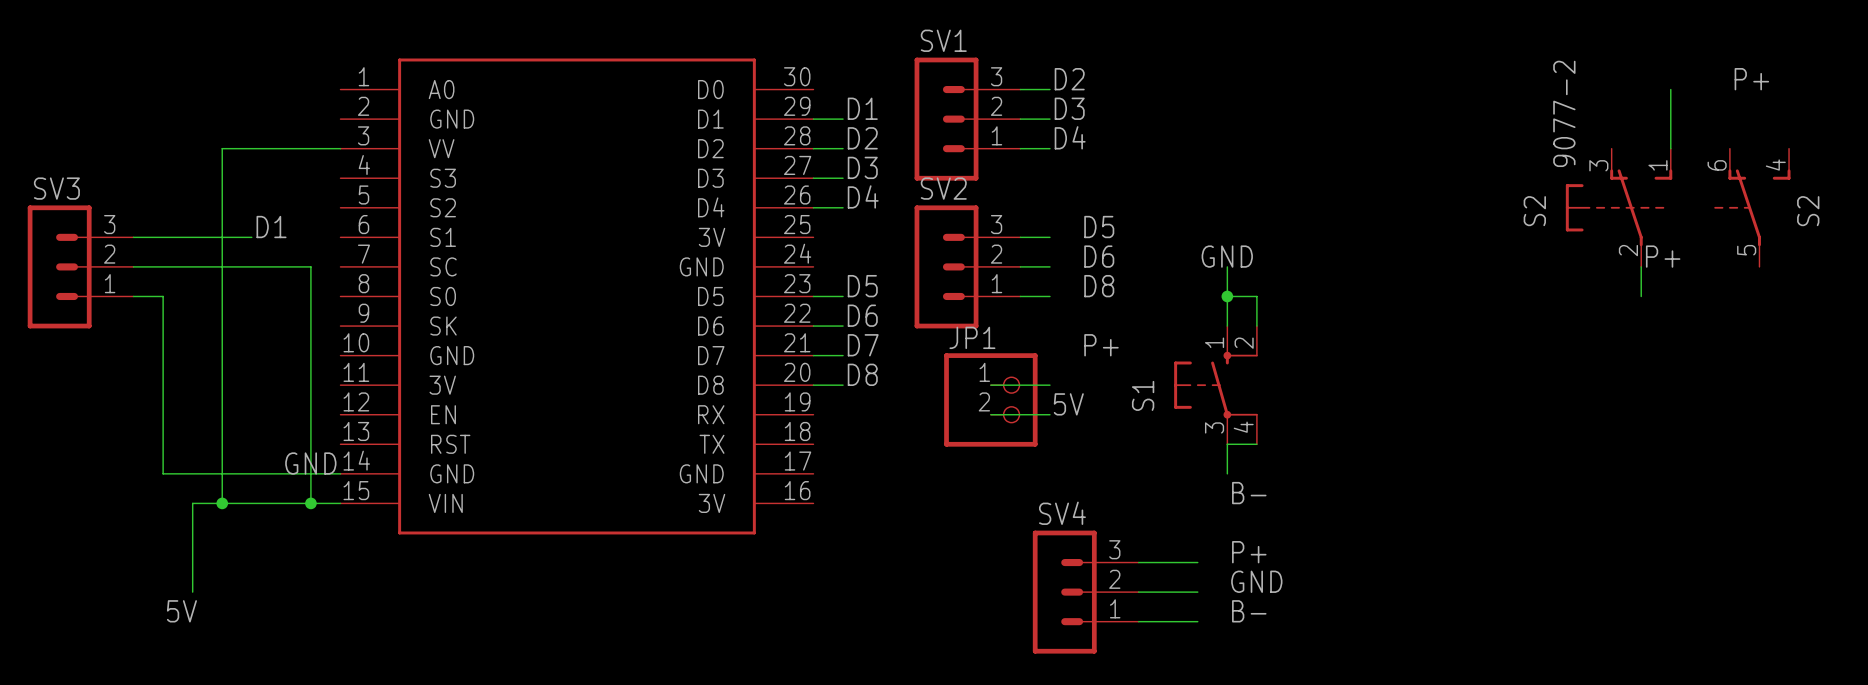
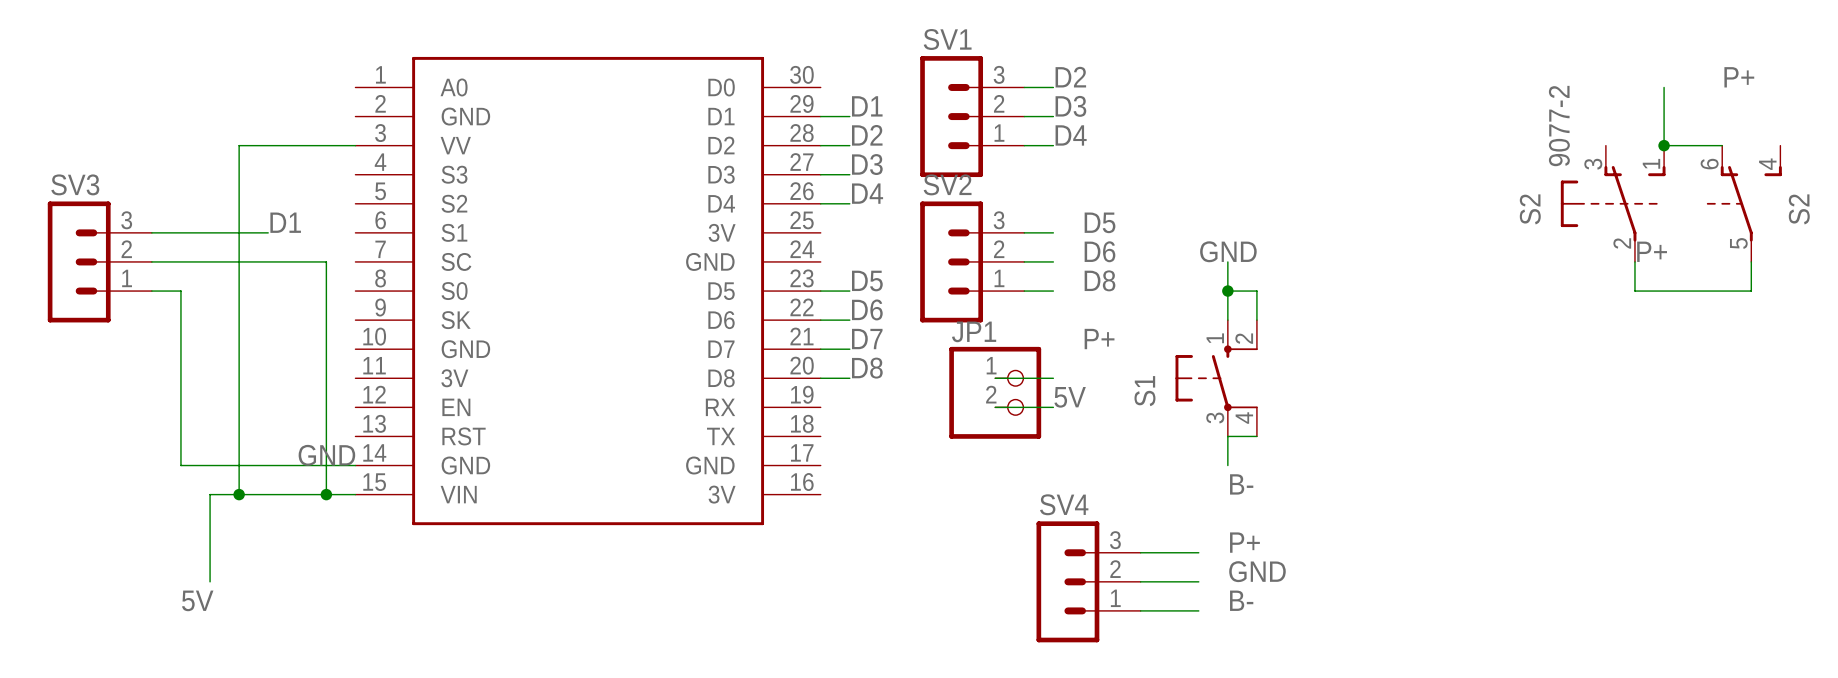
wire: none -> (1664, 145) (1722, 145)
junction: none -> (1664, 145)
wire: none -> (1751, 261) (1751, 291) (1634, 291)

